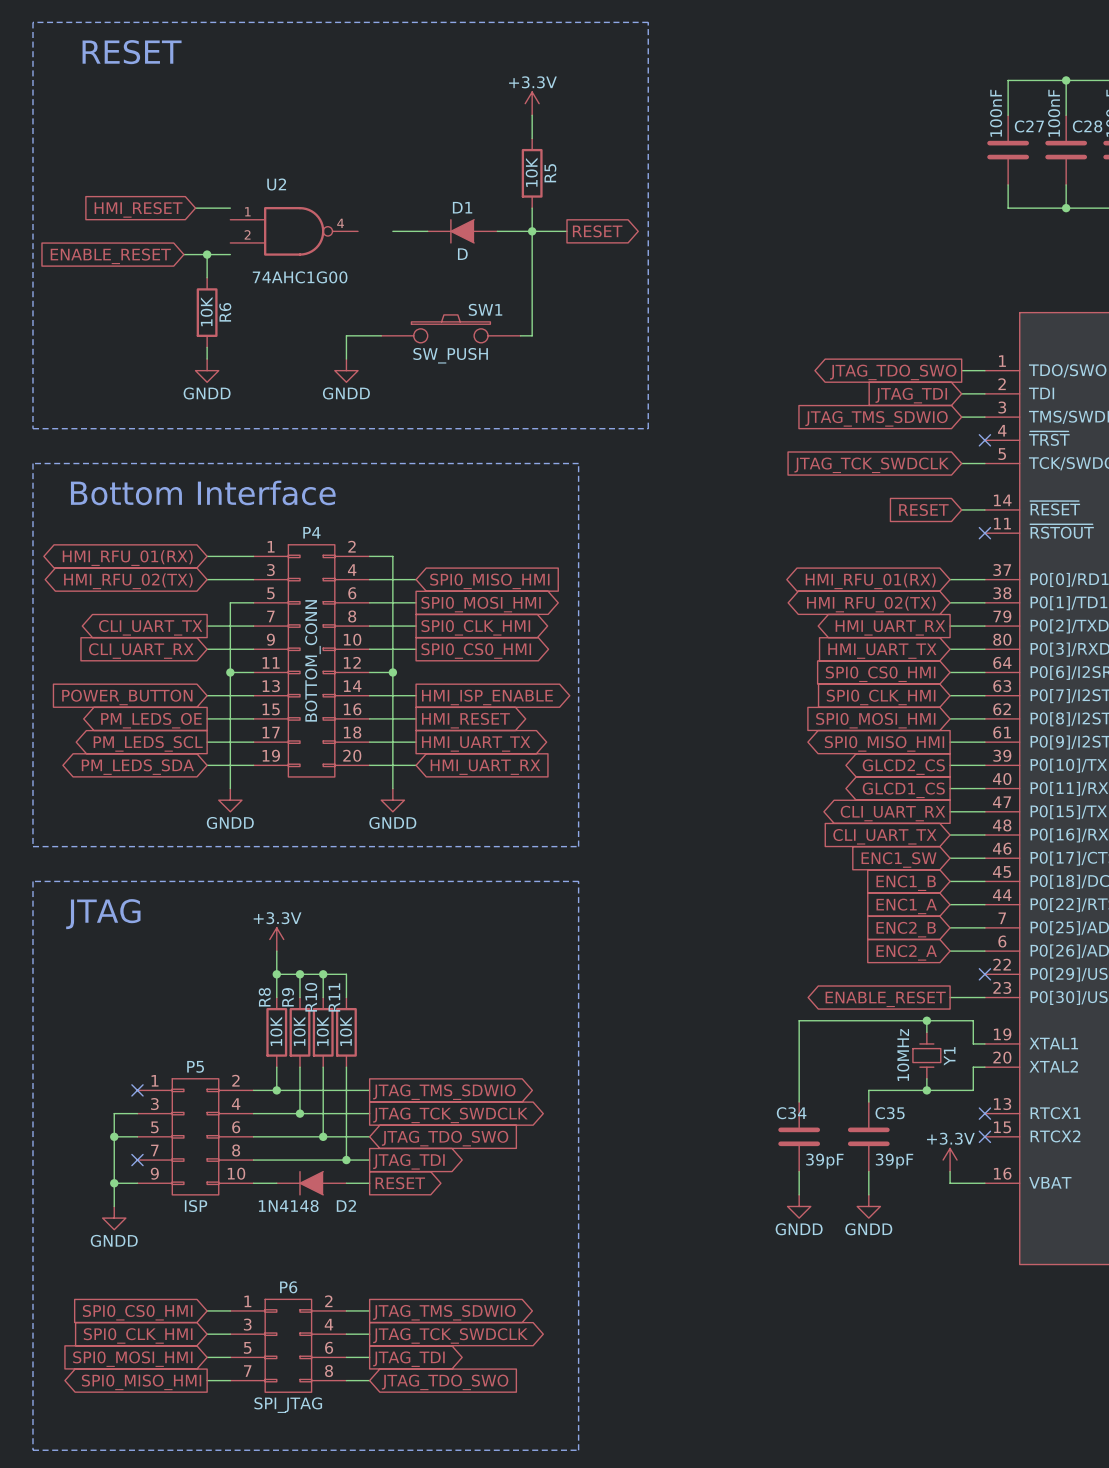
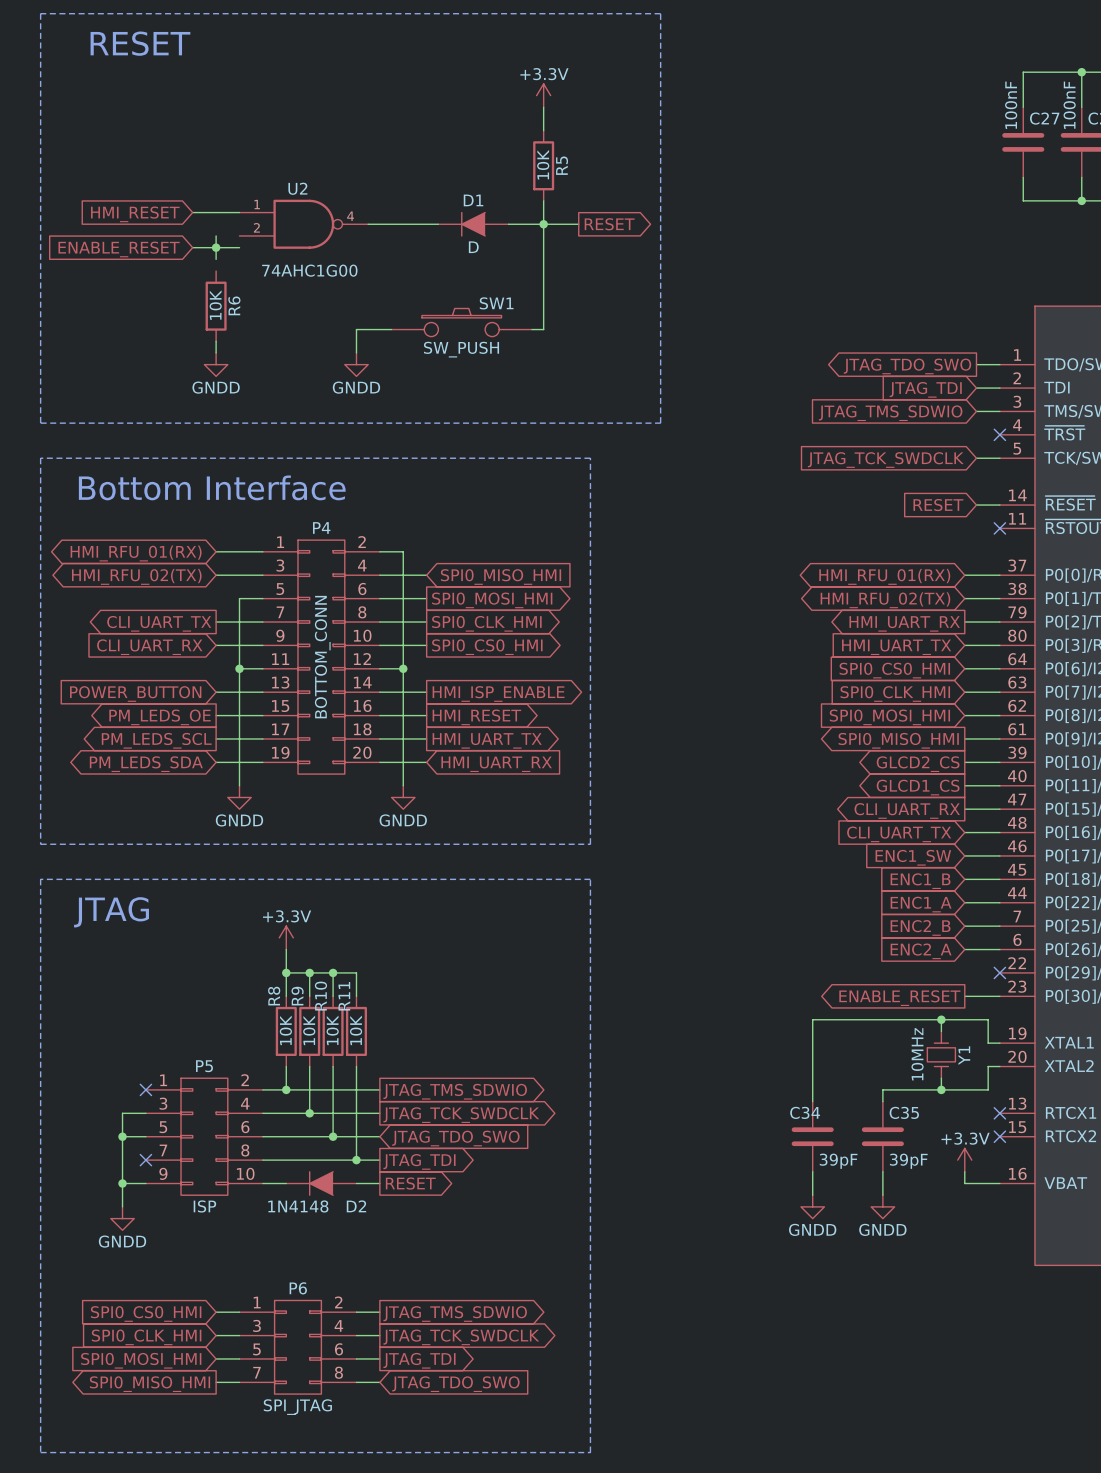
U2 name position: U2 (276, 184) -> U2 (297, 188)
wire: (195, 208) (230, 208) -> (368, 224) (403, 224)
global label position: HMI_RESET (138, 209) -> HMI_RESET (135, 214)
wire: none -> (192, 212) (239, 212)
wire: (207, 266) (207, 277) -> (216, 235) (216, 247)

